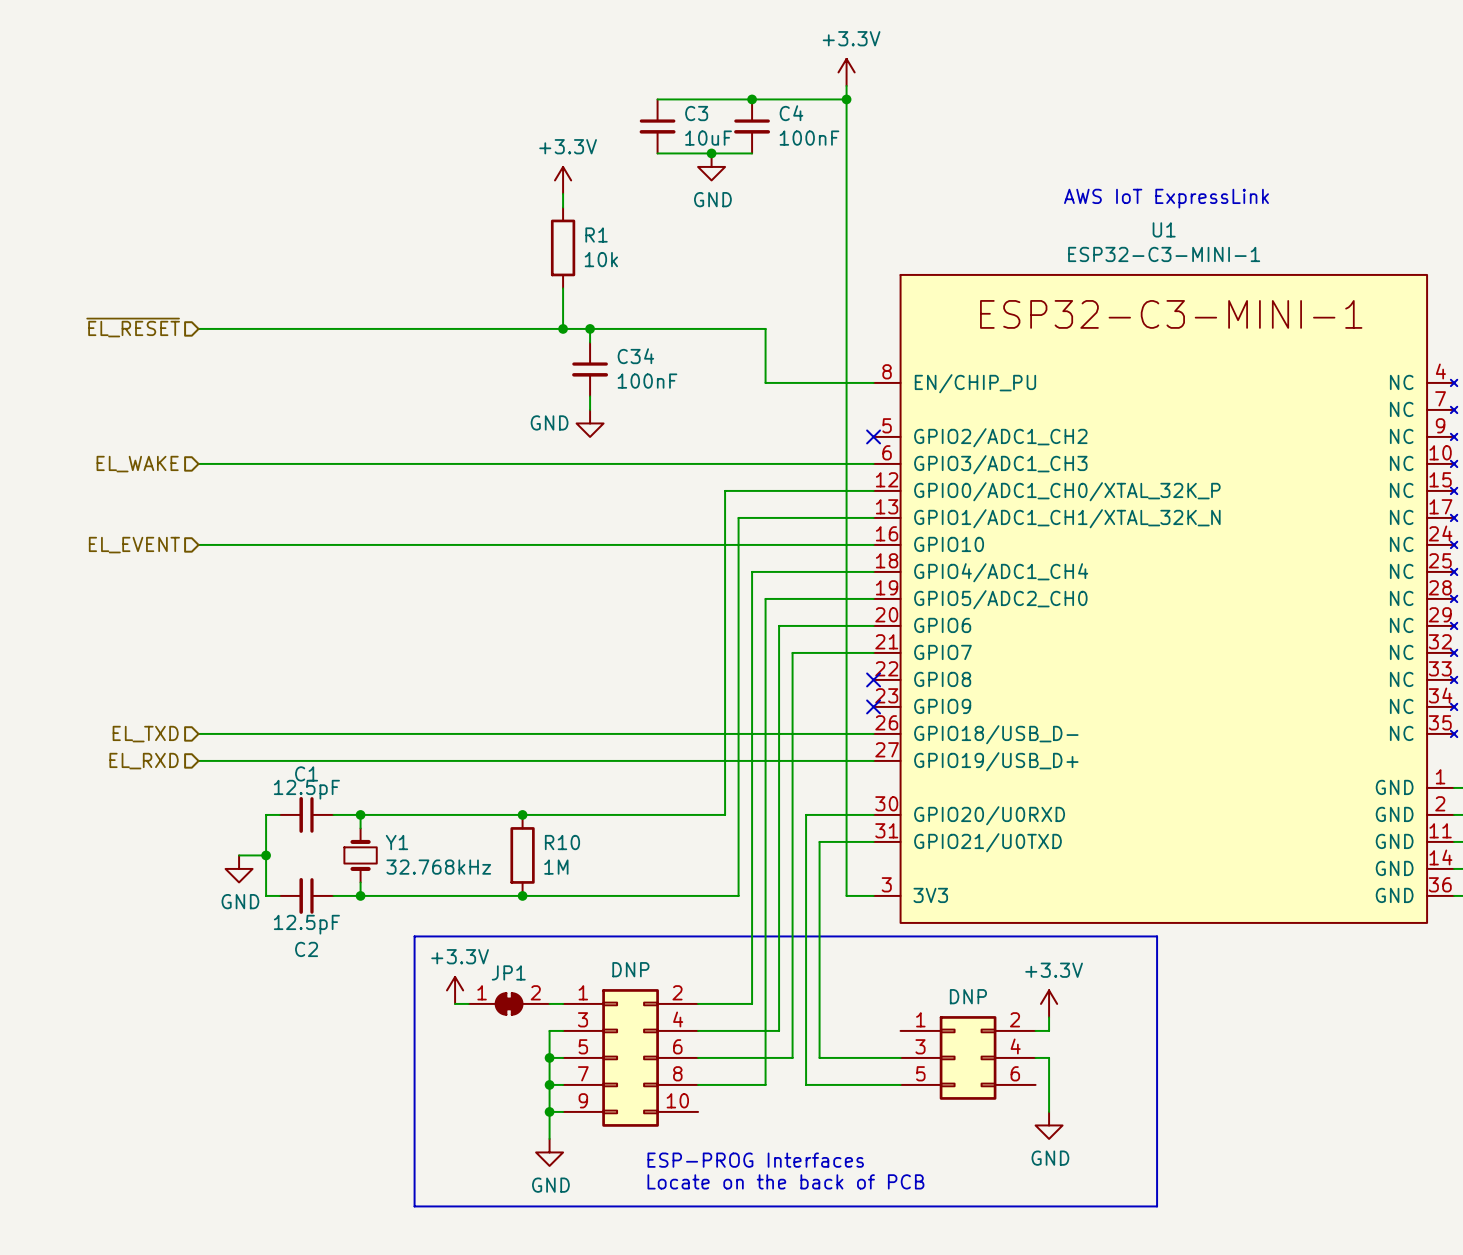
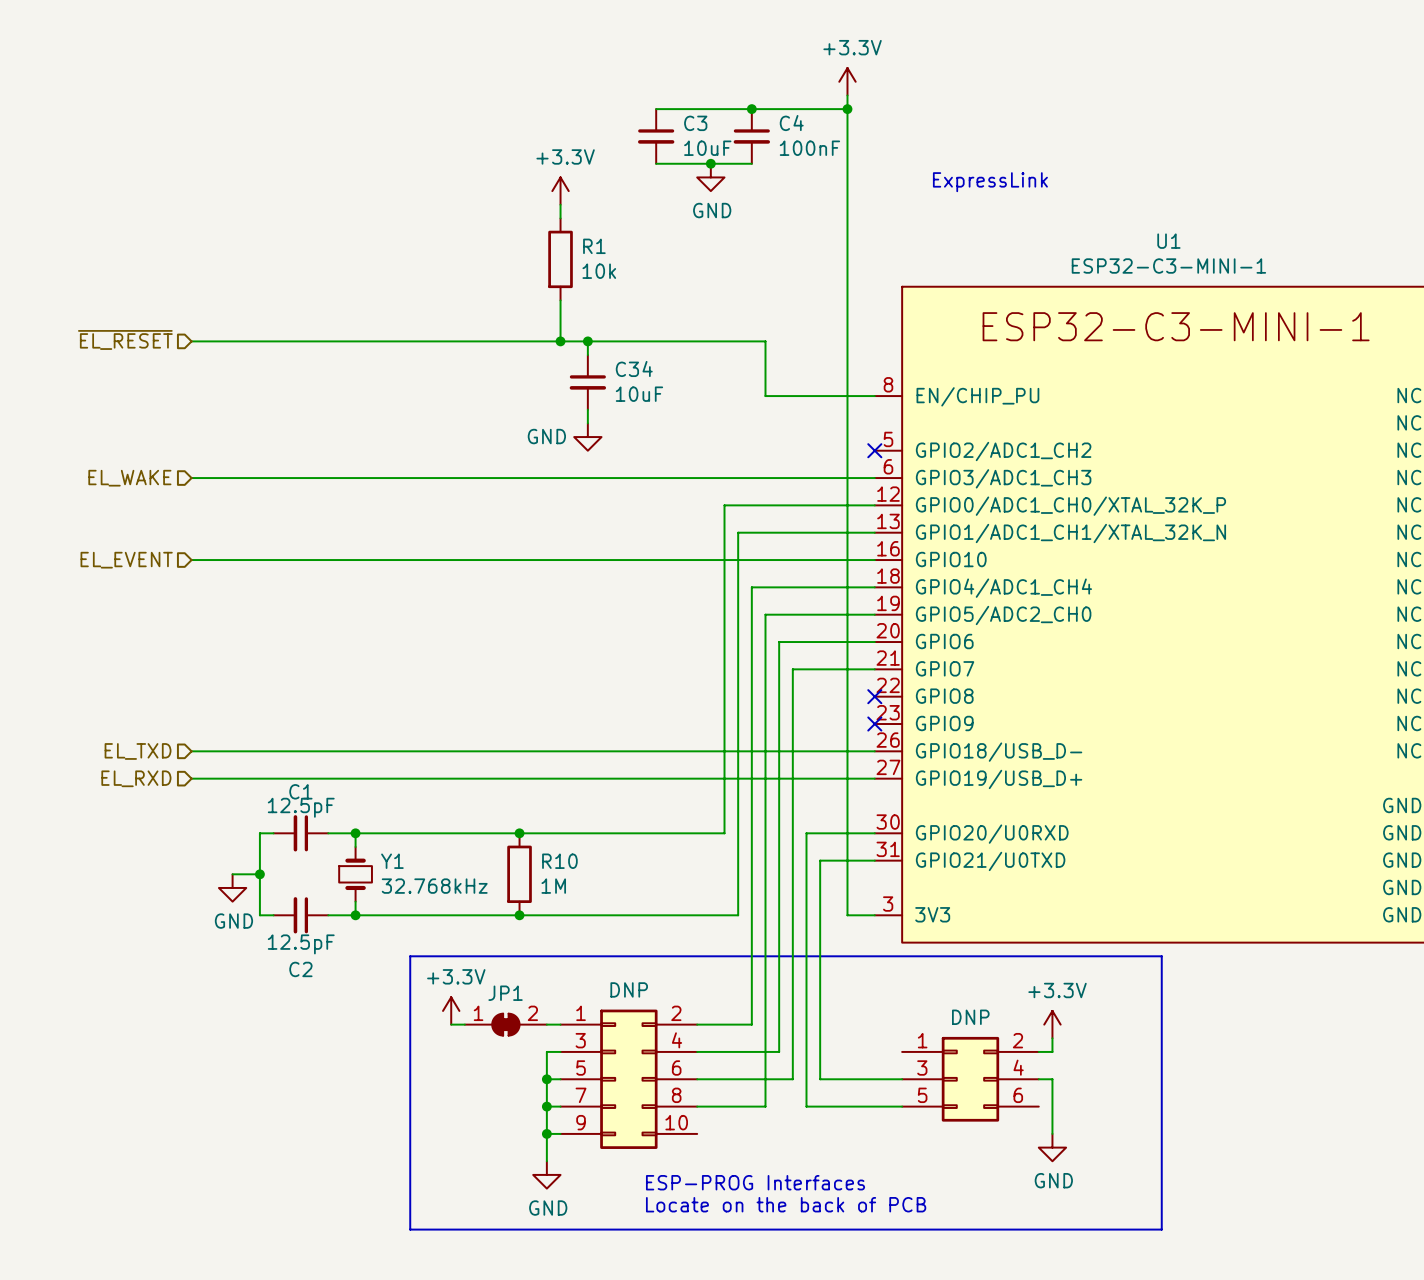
text: AWS IoT ExpressLink (1166, 198) -> ExpressLink (990, 182)
C34 value: 100nF (647, 381) -> 10uF (639, 394)

